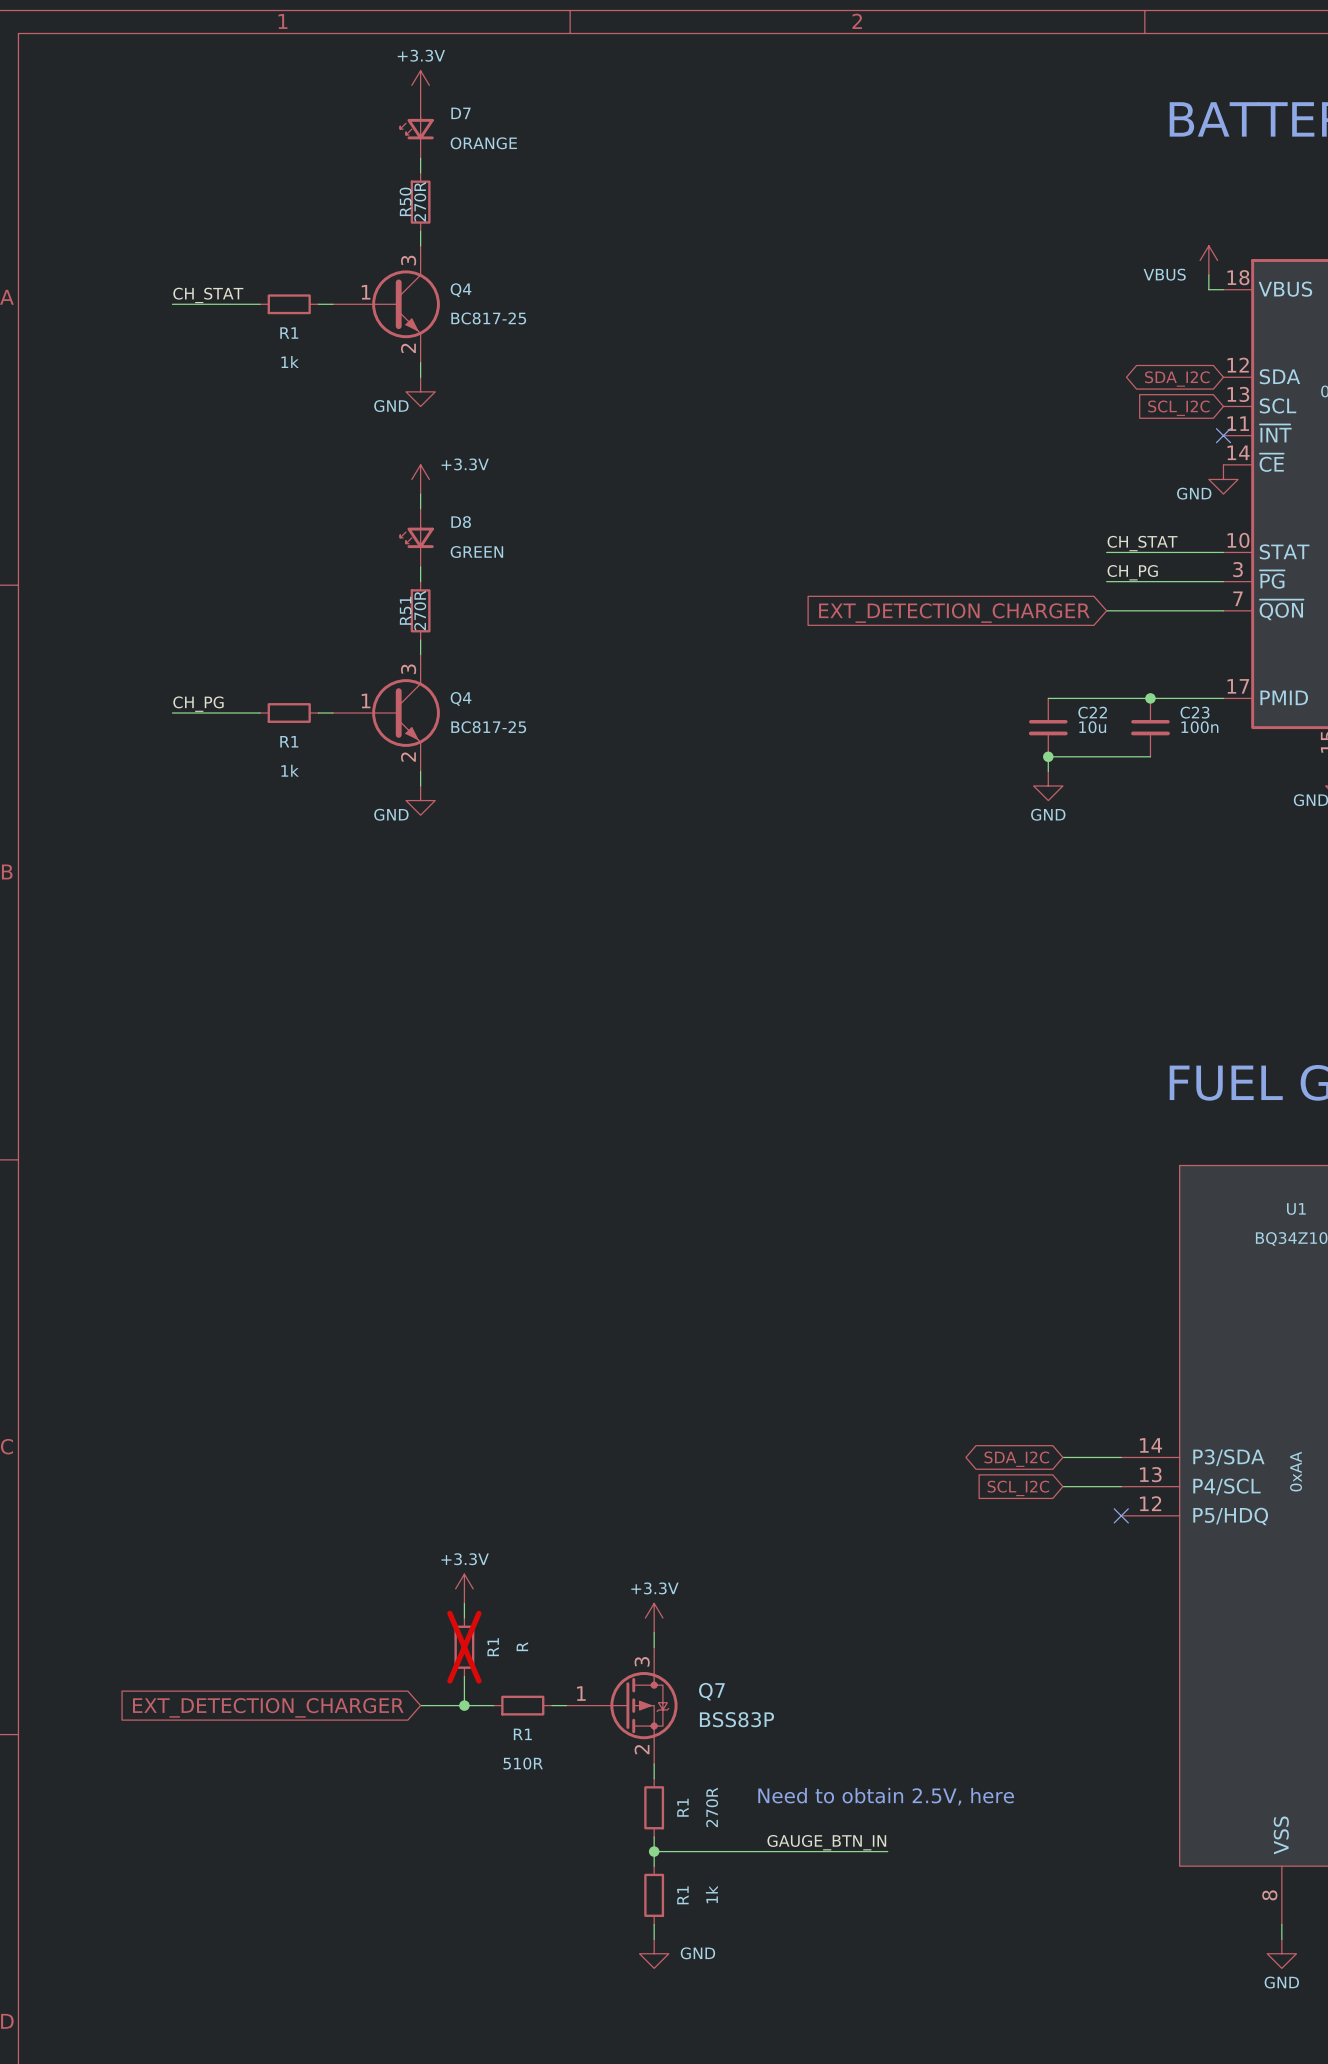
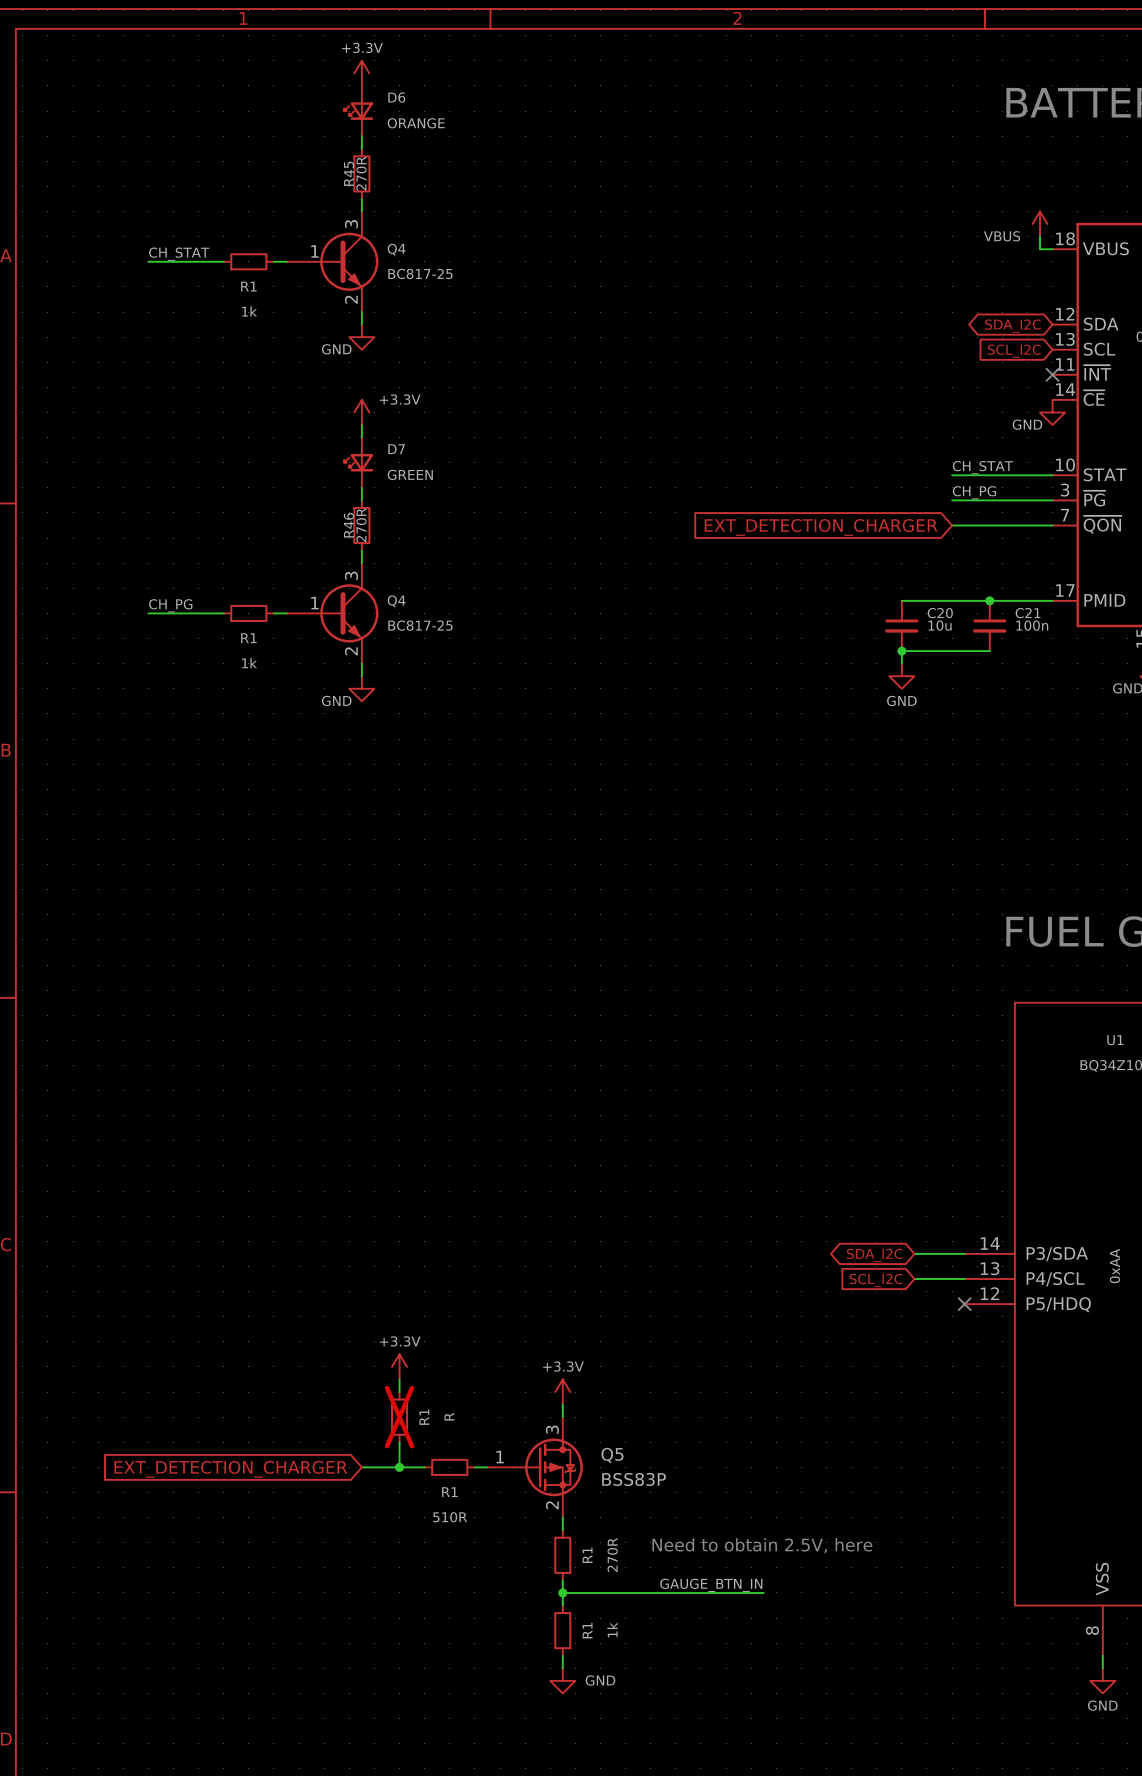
D7 name: D7 (460, 113) -> D6 (396, 97)
R50 name: R50 (405, 201) -> R45 (349, 173)
D8 name: D8 (461, 522) -> D7 (396, 449)
R51 name: R51 (405, 610) -> R46 (348, 525)
C22 name: C22 (1092, 712) -> C20 (940, 613)
C23 name: C23 (1195, 712) -> C21 (1028, 613)
Q7 name: Q7 (711, 1691) -> Q5 (612, 1455)

